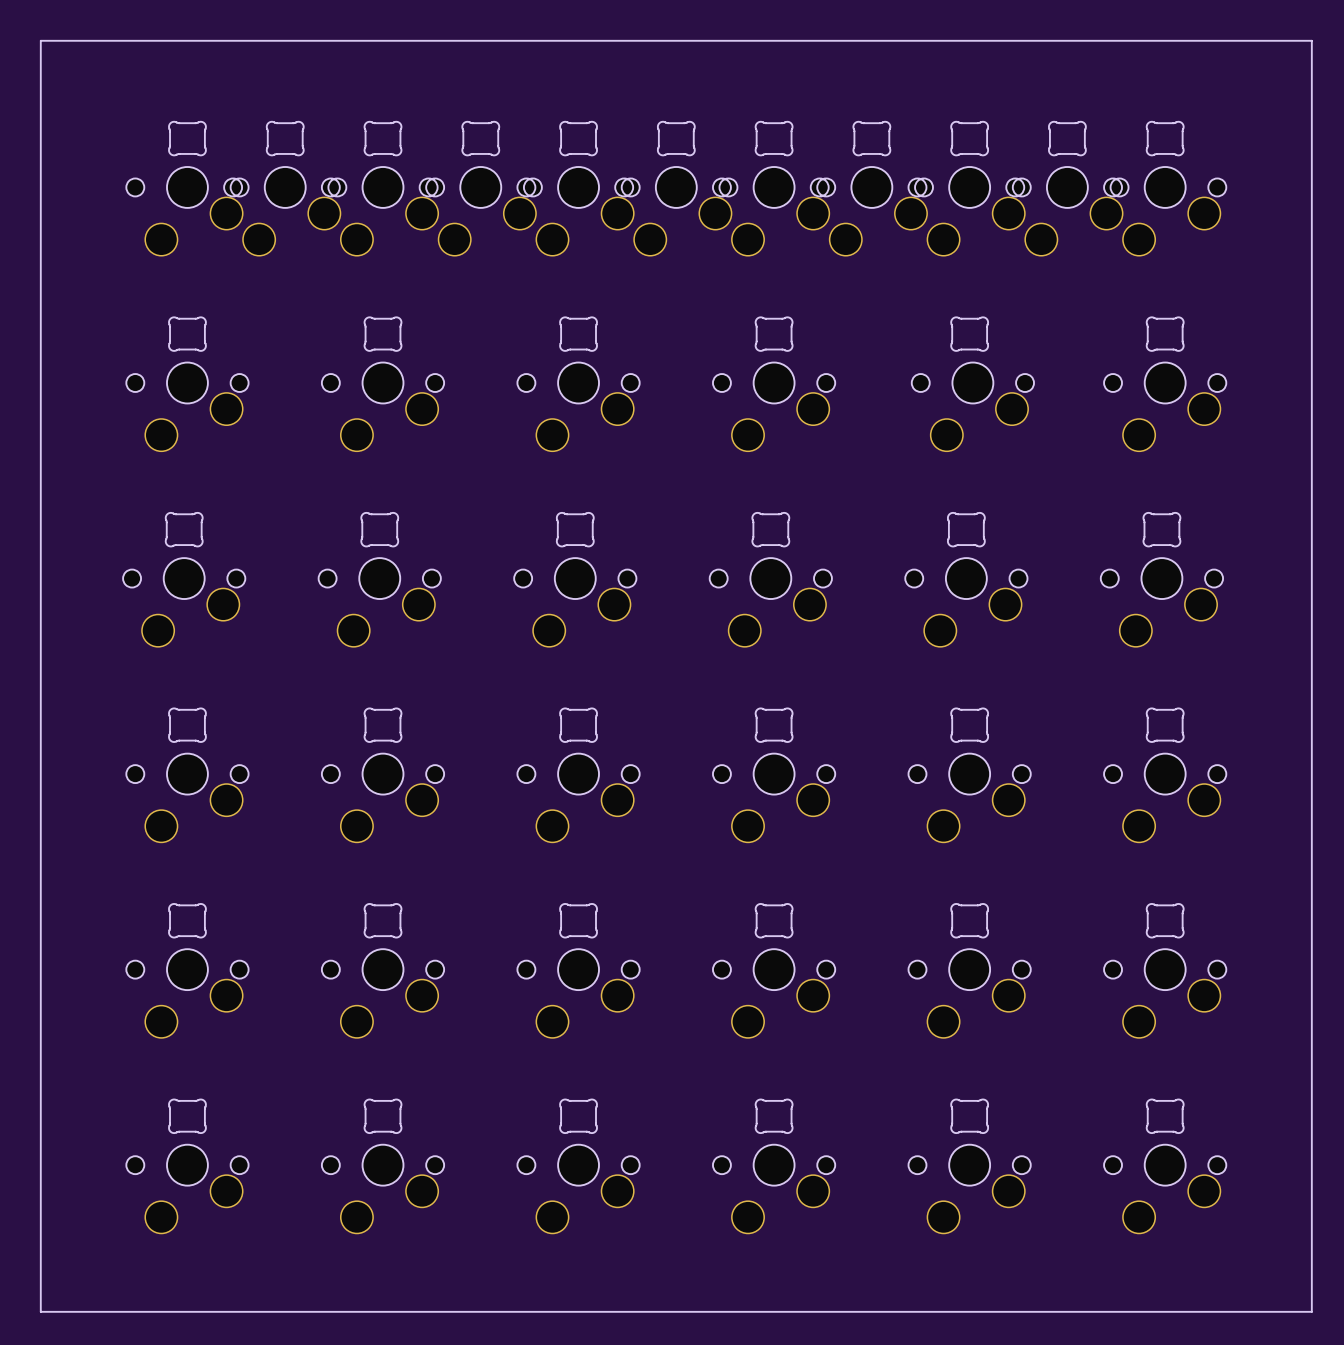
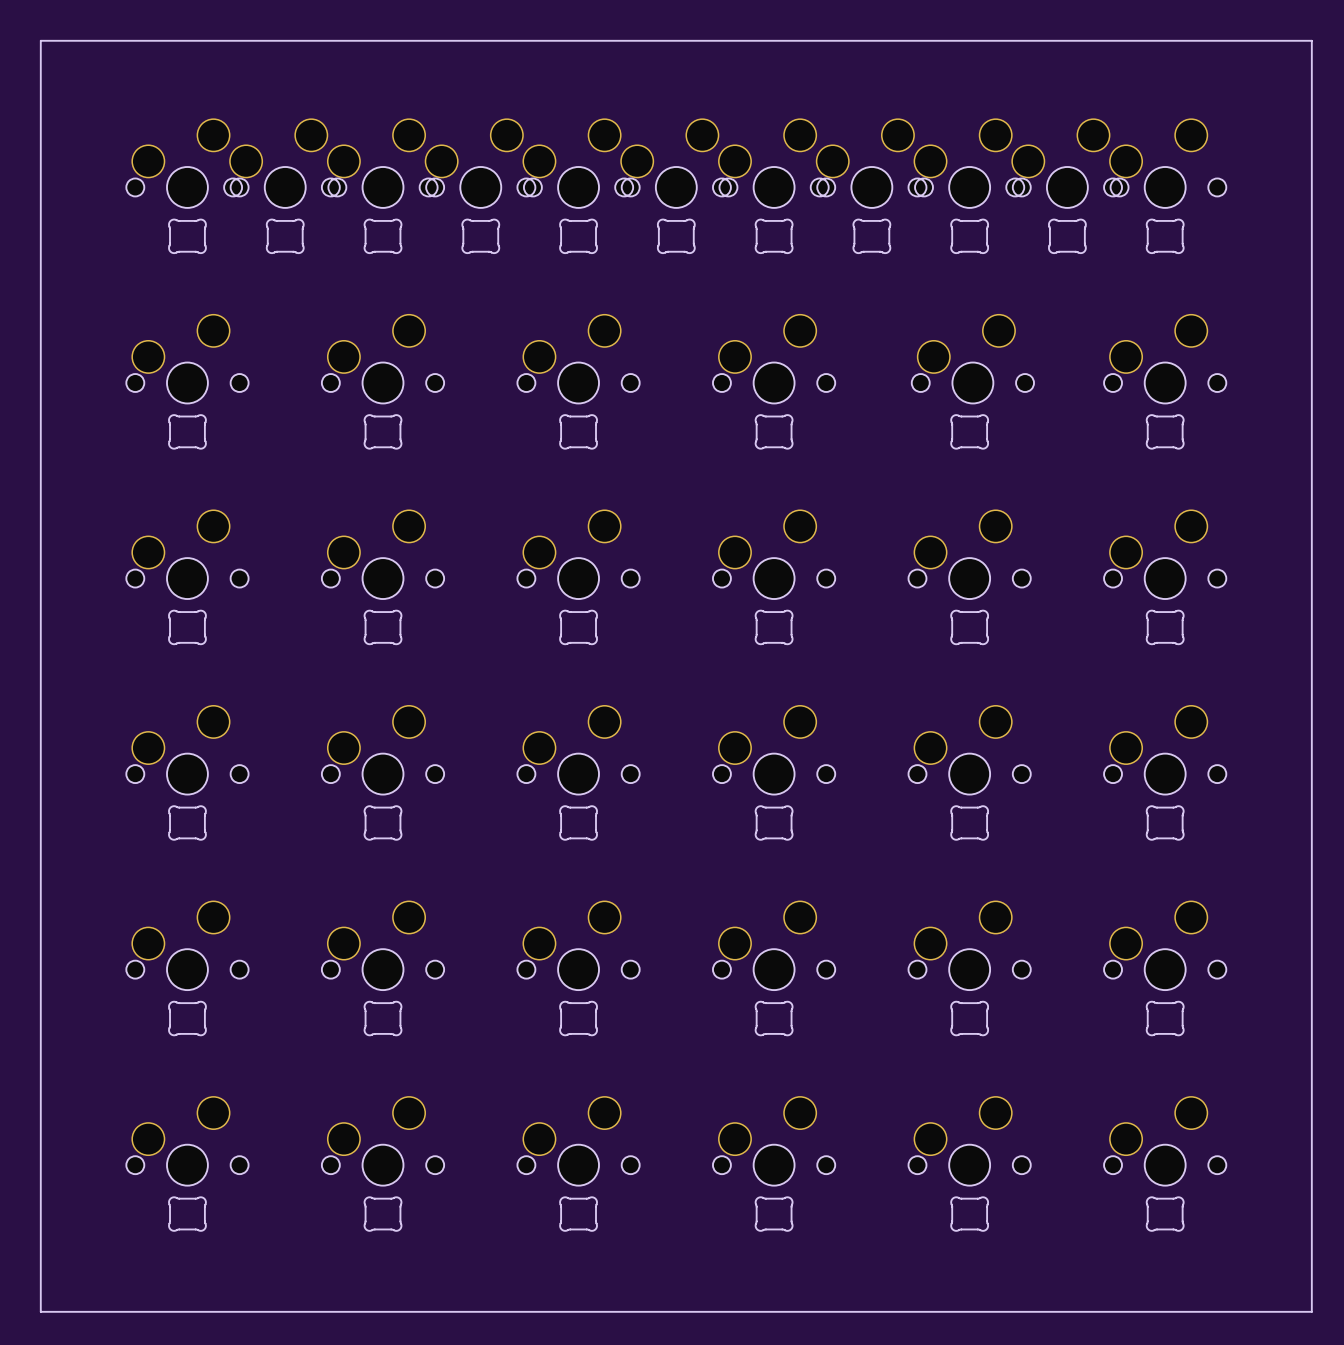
part: (187, 138) -> none
part: (285, 138) -> none
part: (383, 138) -> none
part: (480, 138) -> none
part: (578, 138) -> none
part: (676, 138) -> none
part: (774, 138) -> none
part: (871, 138) -> none
part: (969, 138) -> none
part: (1067, 138) -> none
part: (1165, 138) -> none
part rotation: 0° (187, 211) -> 180° (187, 163)
part rotation: 0° (285, 211) -> 180° (285, 163)
part rotation: 0° (383, 211) -> 180° (383, 163)
part rotation: 0° (480, 211) -> 180° (480, 163)
part rotation: 0° (578, 211) -> 180° (578, 163)
part rotation: 0° (676, 211) -> 180° (676, 163)
part rotation: 0° (774, 211) -> 180° (774, 163)
part rotation: 0° (871, 211) -> 180° (871, 163)
part rotation: 0° (969, 211) -> 180° (969, 163)
part rotation: 0° (1067, 211) -> 180° (1067, 163)
part rotation: 0° (1165, 211) -> 180° (1165, 163)
part: none -> (187, 236)
part: none -> (285, 236)
part: none -> (383, 236)
part: none -> (480, 236)
part: none -> (578, 236)
part: none -> (676, 236)
part: none -> (774, 236)
part: none -> (871, 236)
part: none -> (969, 236)
part: none -> (1067, 236)
part: none -> (1165, 236)
part: (187, 334) -> none
part: (383, 334) -> none
part: (578, 334) -> none
part: (774, 334) -> none
part: (969, 334) -> none
part: (1165, 334) -> none
part rotation: 0° (187, 407) -> 180° (187, 358)
part rotation: 0° (383, 407) -> 180° (383, 358)
part rotation: 0° (578, 407) -> 180° (578, 358)
part rotation: 0° (774, 407) -> 180° (774, 358)
part rotation: 0° (972, 407) -> 180° (972, 358)
part rotation: 0° (1165, 407) -> 180° (1165, 358)
part: none -> (187, 431)
part: none -> (383, 431)
part: none -> (578, 431)
part: none -> (774, 431)
part: none -> (969, 431)
part: none -> (1165, 431)
part: (184, 529) -> none
part: (379, 529) -> none
part: (575, 529) -> none
part: (770, 529) -> none
part: (966, 529) -> none
part: (1161, 529) -> none
part rotation: 0° (184, 602) -> 180° (187, 554)
part rotation: 0° (379, 602) -> 180° (383, 554)
part rotation: 0° (575, 602) -> 180° (578, 554)
part rotation: 0° (770, 602) -> 180° (774, 554)
part rotation: 0° (966, 602) -> 180° (969, 554)
part rotation: 0° (1161, 602) -> 180° (1165, 554)
part: none -> (187, 627)
part: none -> (383, 627)
part: none -> (578, 627)
part: none -> (774, 627)
part: none -> (969, 627)
part: none -> (1165, 627)
part: (187, 725) -> none
part: (383, 725) -> none
part: (578, 725) -> none
part: (774, 725) -> none
part: (969, 725) -> none
part: (1165, 725) -> none
part rotation: 0° (187, 798) -> 180° (187, 749)
part rotation: 0° (383, 798) -> 180° (383, 749)
part rotation: 0° (578, 798) -> 180° (578, 749)
part rotation: 0° (774, 798) -> 180° (774, 749)
part rotation: 0° (969, 798) -> 180° (969, 749)
part rotation: 0° (1165, 798) -> 180° (1165, 749)
part: none -> (187, 822)
part: none -> (383, 822)
part: none -> (578, 822)
part: none -> (774, 822)
part: none -> (969, 822)
part: none -> (1165, 822)
part: (187, 920) -> none
part: (383, 920) -> none
part: (578, 920) -> none
part: (774, 920) -> none
part: (969, 920) -> none
part: (1165, 920) -> none
part rotation: 0° (187, 993) -> 180° (187, 945)
part rotation: 0° (383, 993) -> 180° (383, 945)
part rotation: 0° (578, 993) -> 180° (578, 945)
part rotation: 0° (774, 993) -> 180° (774, 945)
part rotation: 0° (969, 993) -> 180° (969, 945)
part rotation: 0° (1165, 993) -> 180° (1165, 945)
part: none -> (187, 1018)
part: none -> (383, 1018)
part: none -> (578, 1018)
part: none -> (774, 1018)
part: none -> (969, 1018)
part: none -> (1165, 1018)
part: (187, 1116) -> none
part: (383, 1116) -> none
part: (578, 1116) -> none
part: (774, 1116) -> none
part: (969, 1116) -> none
part: (1165, 1116) -> none
part rotation: 0° (187, 1189) -> 180° (187, 1140)
part rotation: 0° (383, 1189) -> 180° (383, 1140)
part rotation: 0° (578, 1189) -> 180° (578, 1140)
part rotation: 0° (774, 1189) -> 180° (774, 1140)
part rotation: 0° (969, 1189) -> 180° (969, 1140)
part rotation: 0° (1165, 1189) -> 180° (1165, 1140)
part: none -> (187, 1214)
part: none -> (383, 1214)
part: none -> (578, 1214)
part: none -> (774, 1214)
part: none -> (969, 1214)
part: none -> (1165, 1214)

